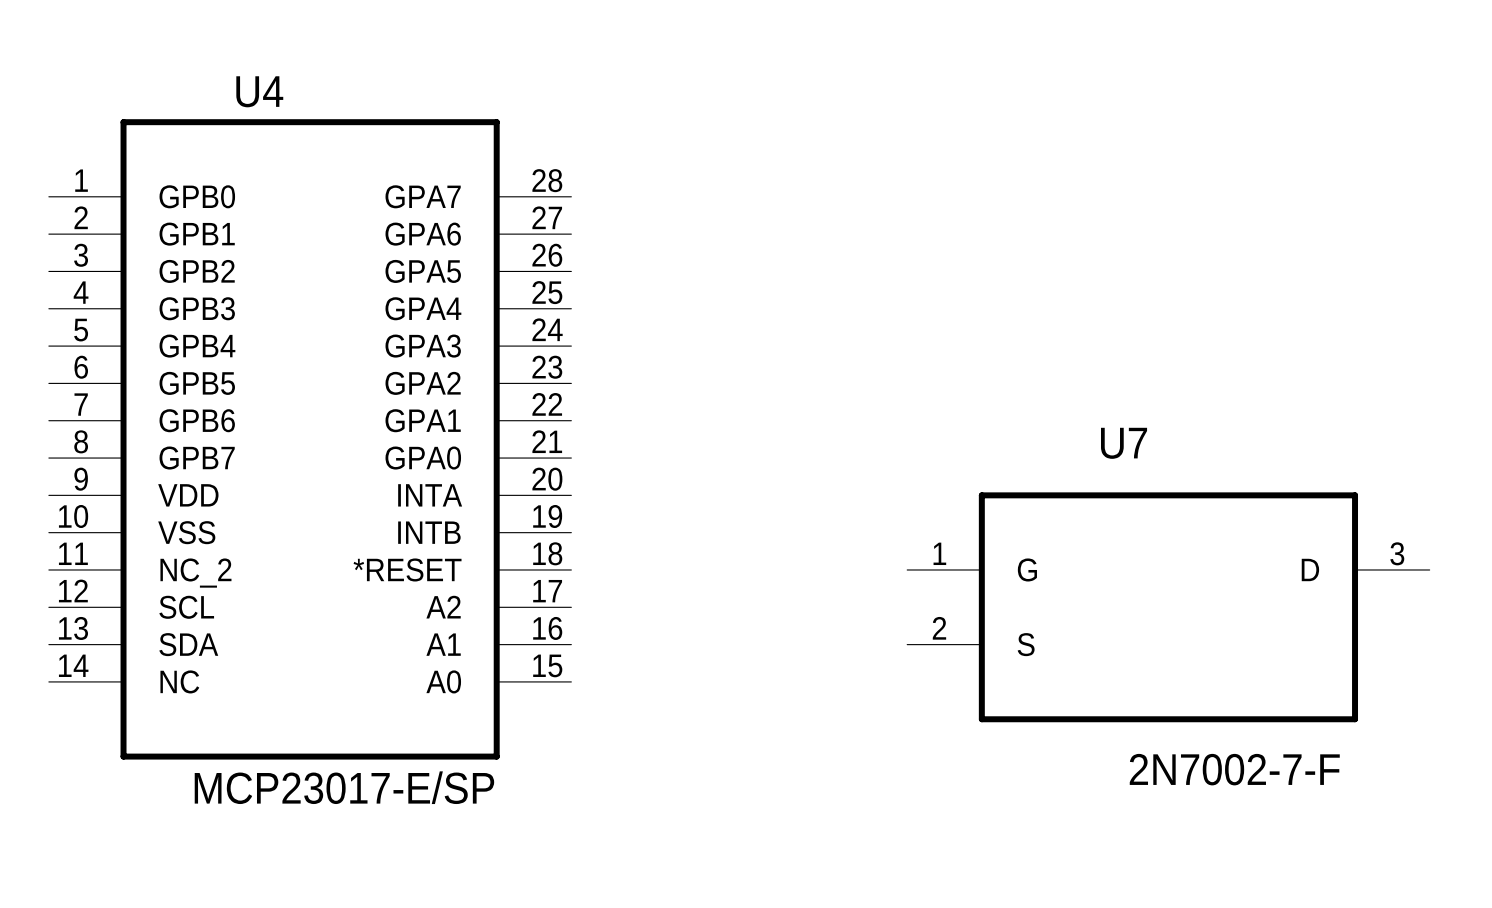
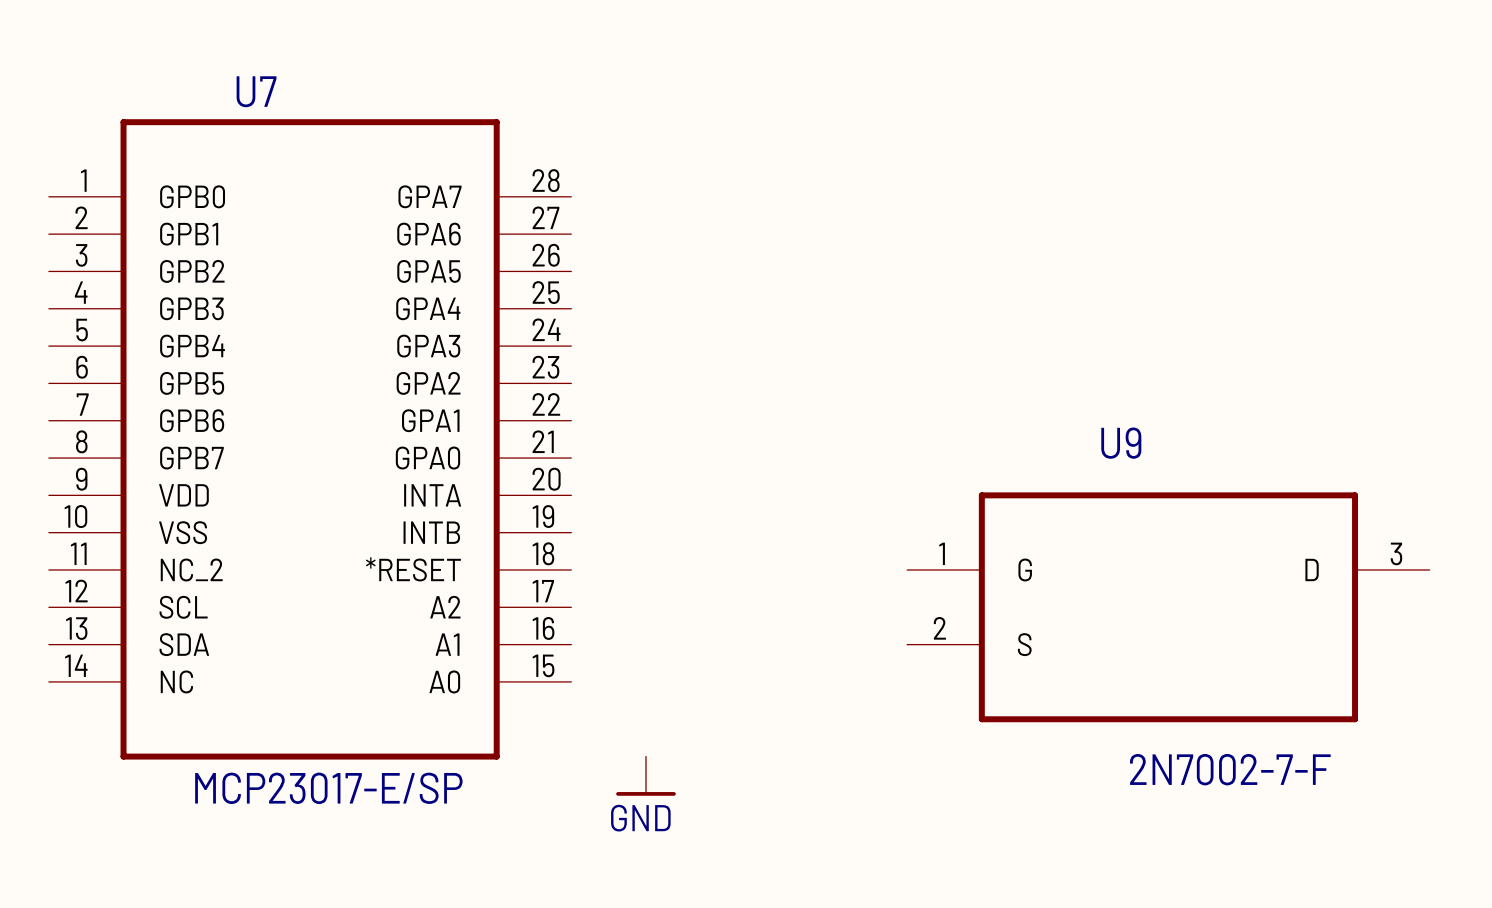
U4 name: U4 (259, 91) -> U7 (256, 91)
U7 name: U7 (1124, 443) -> U9 (1121, 443)
power symbol: none -> GND (645, 776)

